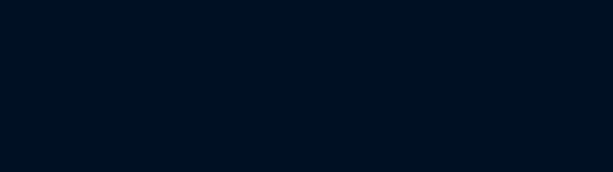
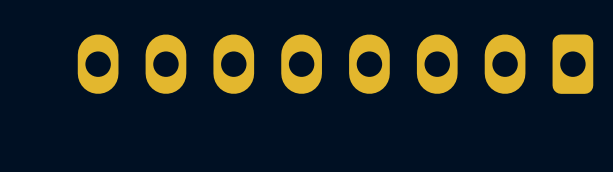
part: none -> (335, 64)

